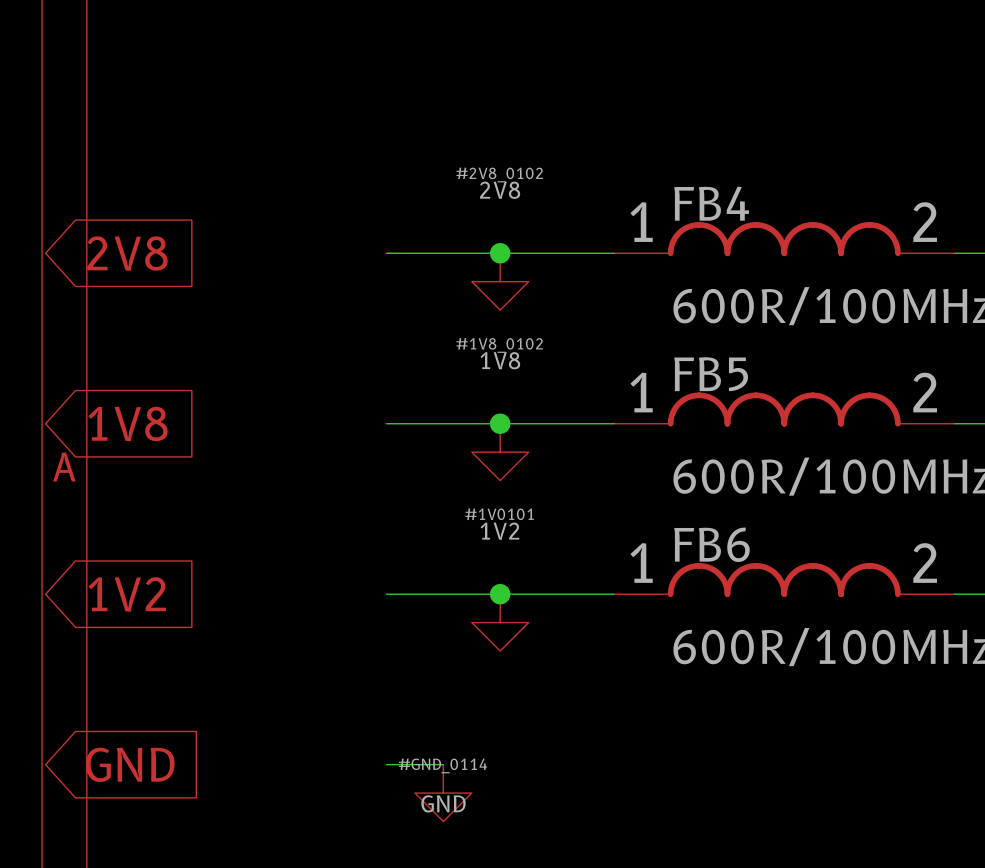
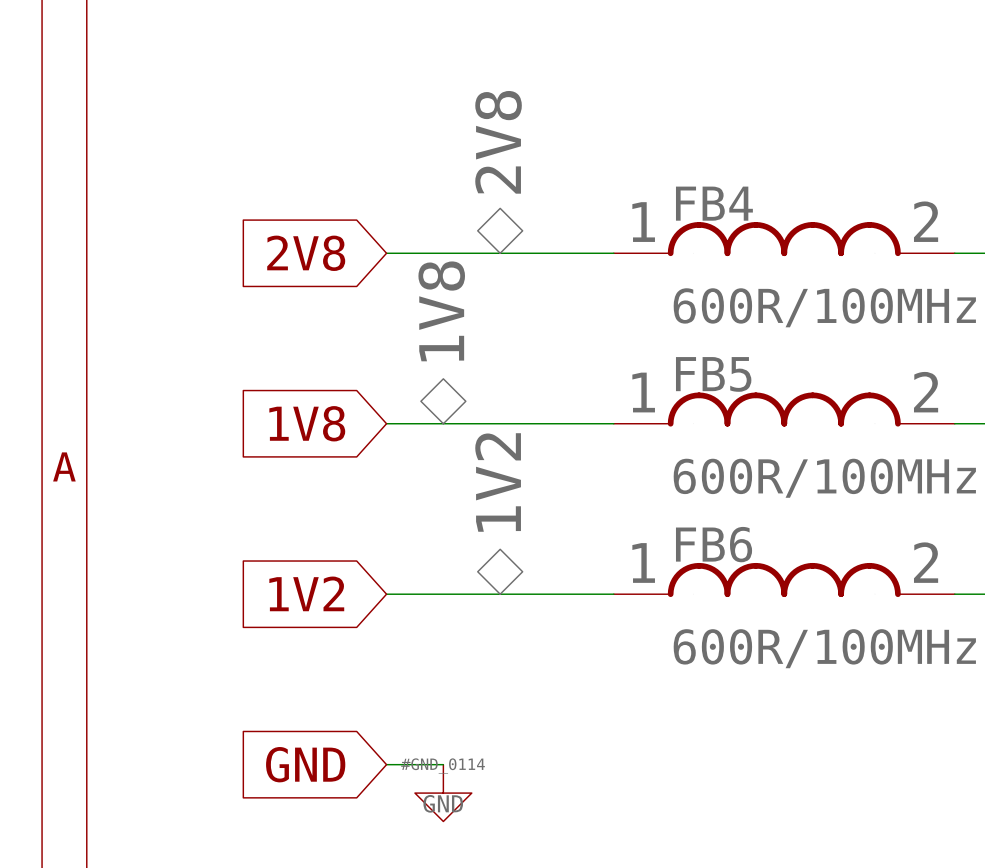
hierarchical label: none -> 2V8 (498, 142)
global label rotation: 0° (127, 253) -> 180° (306, 253)
junction: (500, 253) -> none
#2V8_0102: 2V8 (500, 281) -> none
hierarchical label: none -> 1V8 (441, 311)
global label rotation: 0° (128, 423) -> 180° (307, 423)
junction: (500, 423) -> none
#1V8_0102: 1V8 (500, 452) -> none
hierarchical label: none -> 1V2 (498, 482)
global label rotation: 0° (127, 594) -> 180° (306, 593)
junction: (500, 594) -> none
#1V0101: 1V2 (500, 622) -> none
global label rotation: 0° (130, 764) -> 180° (305, 764)

